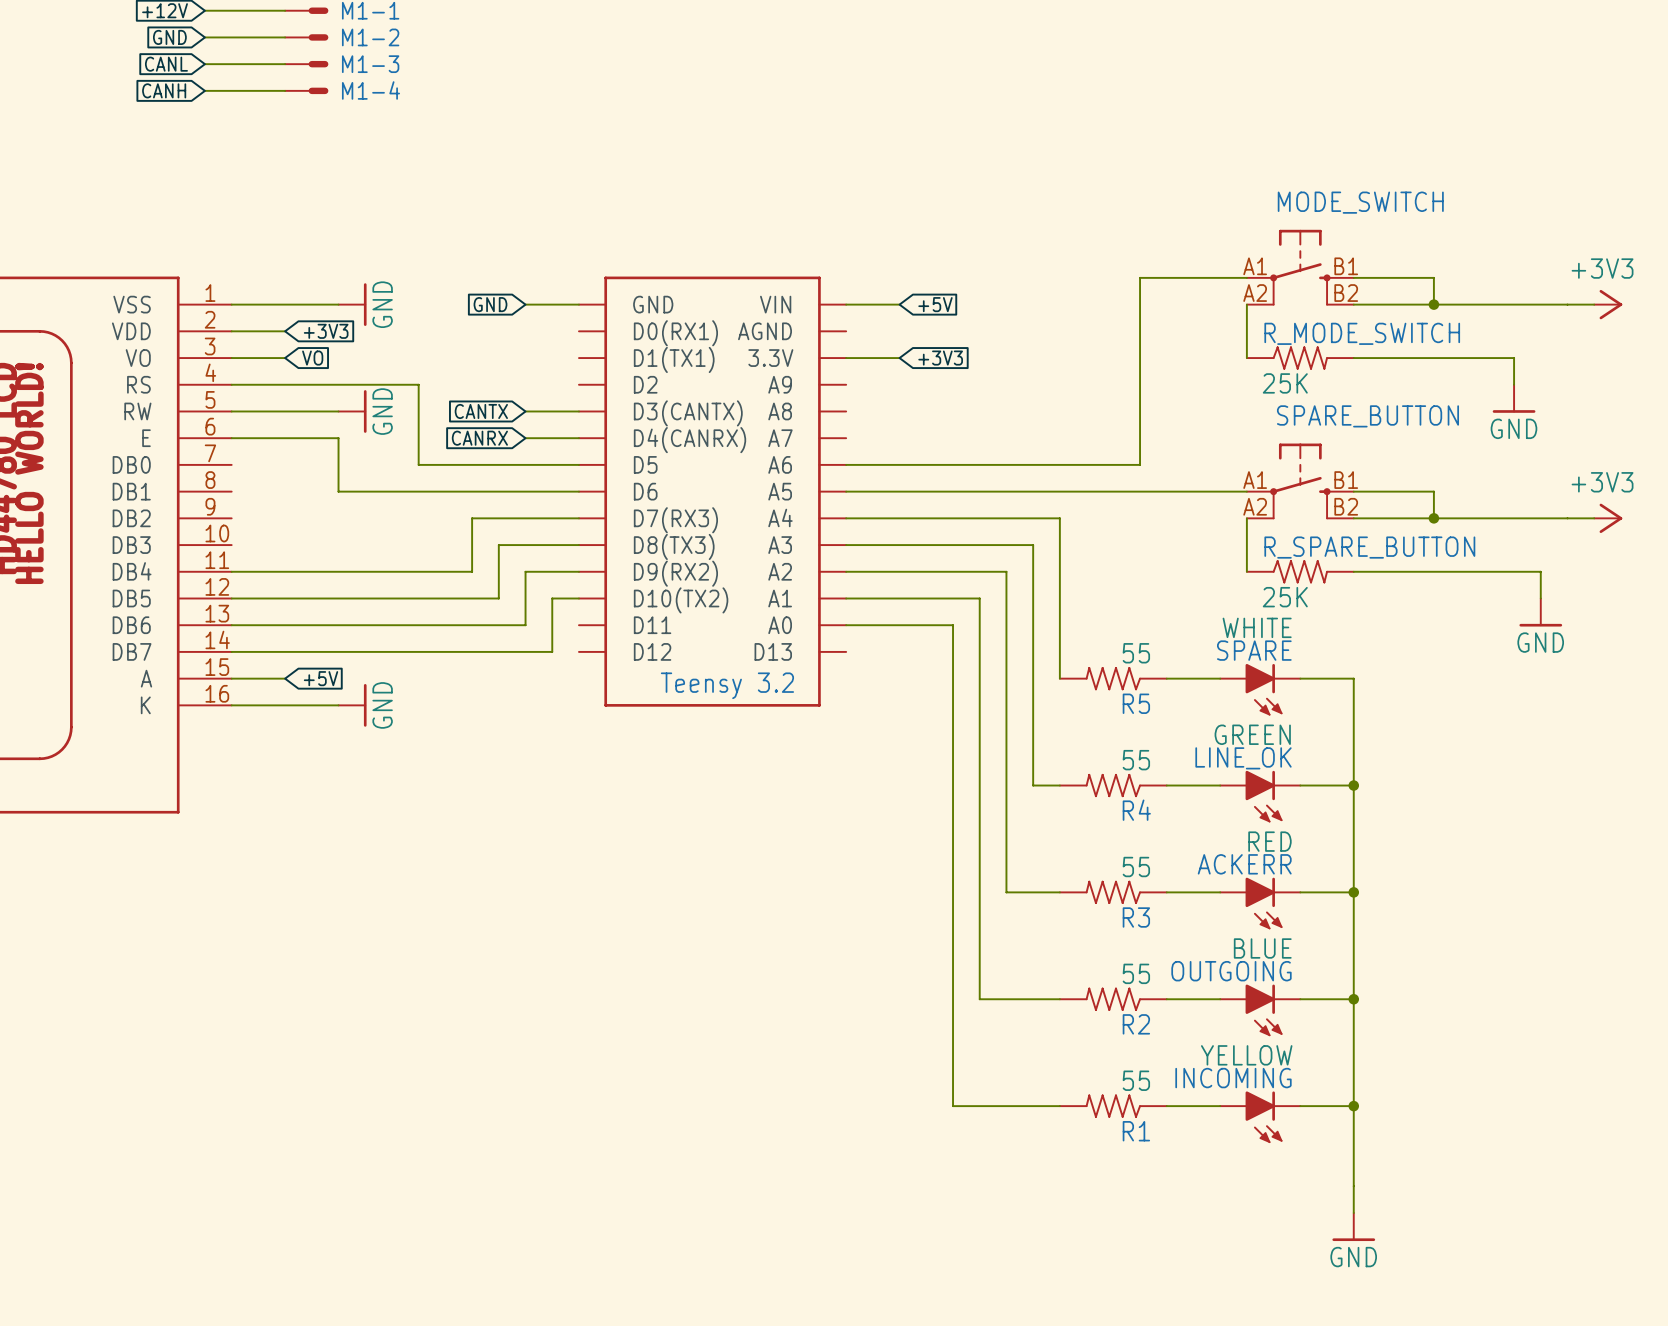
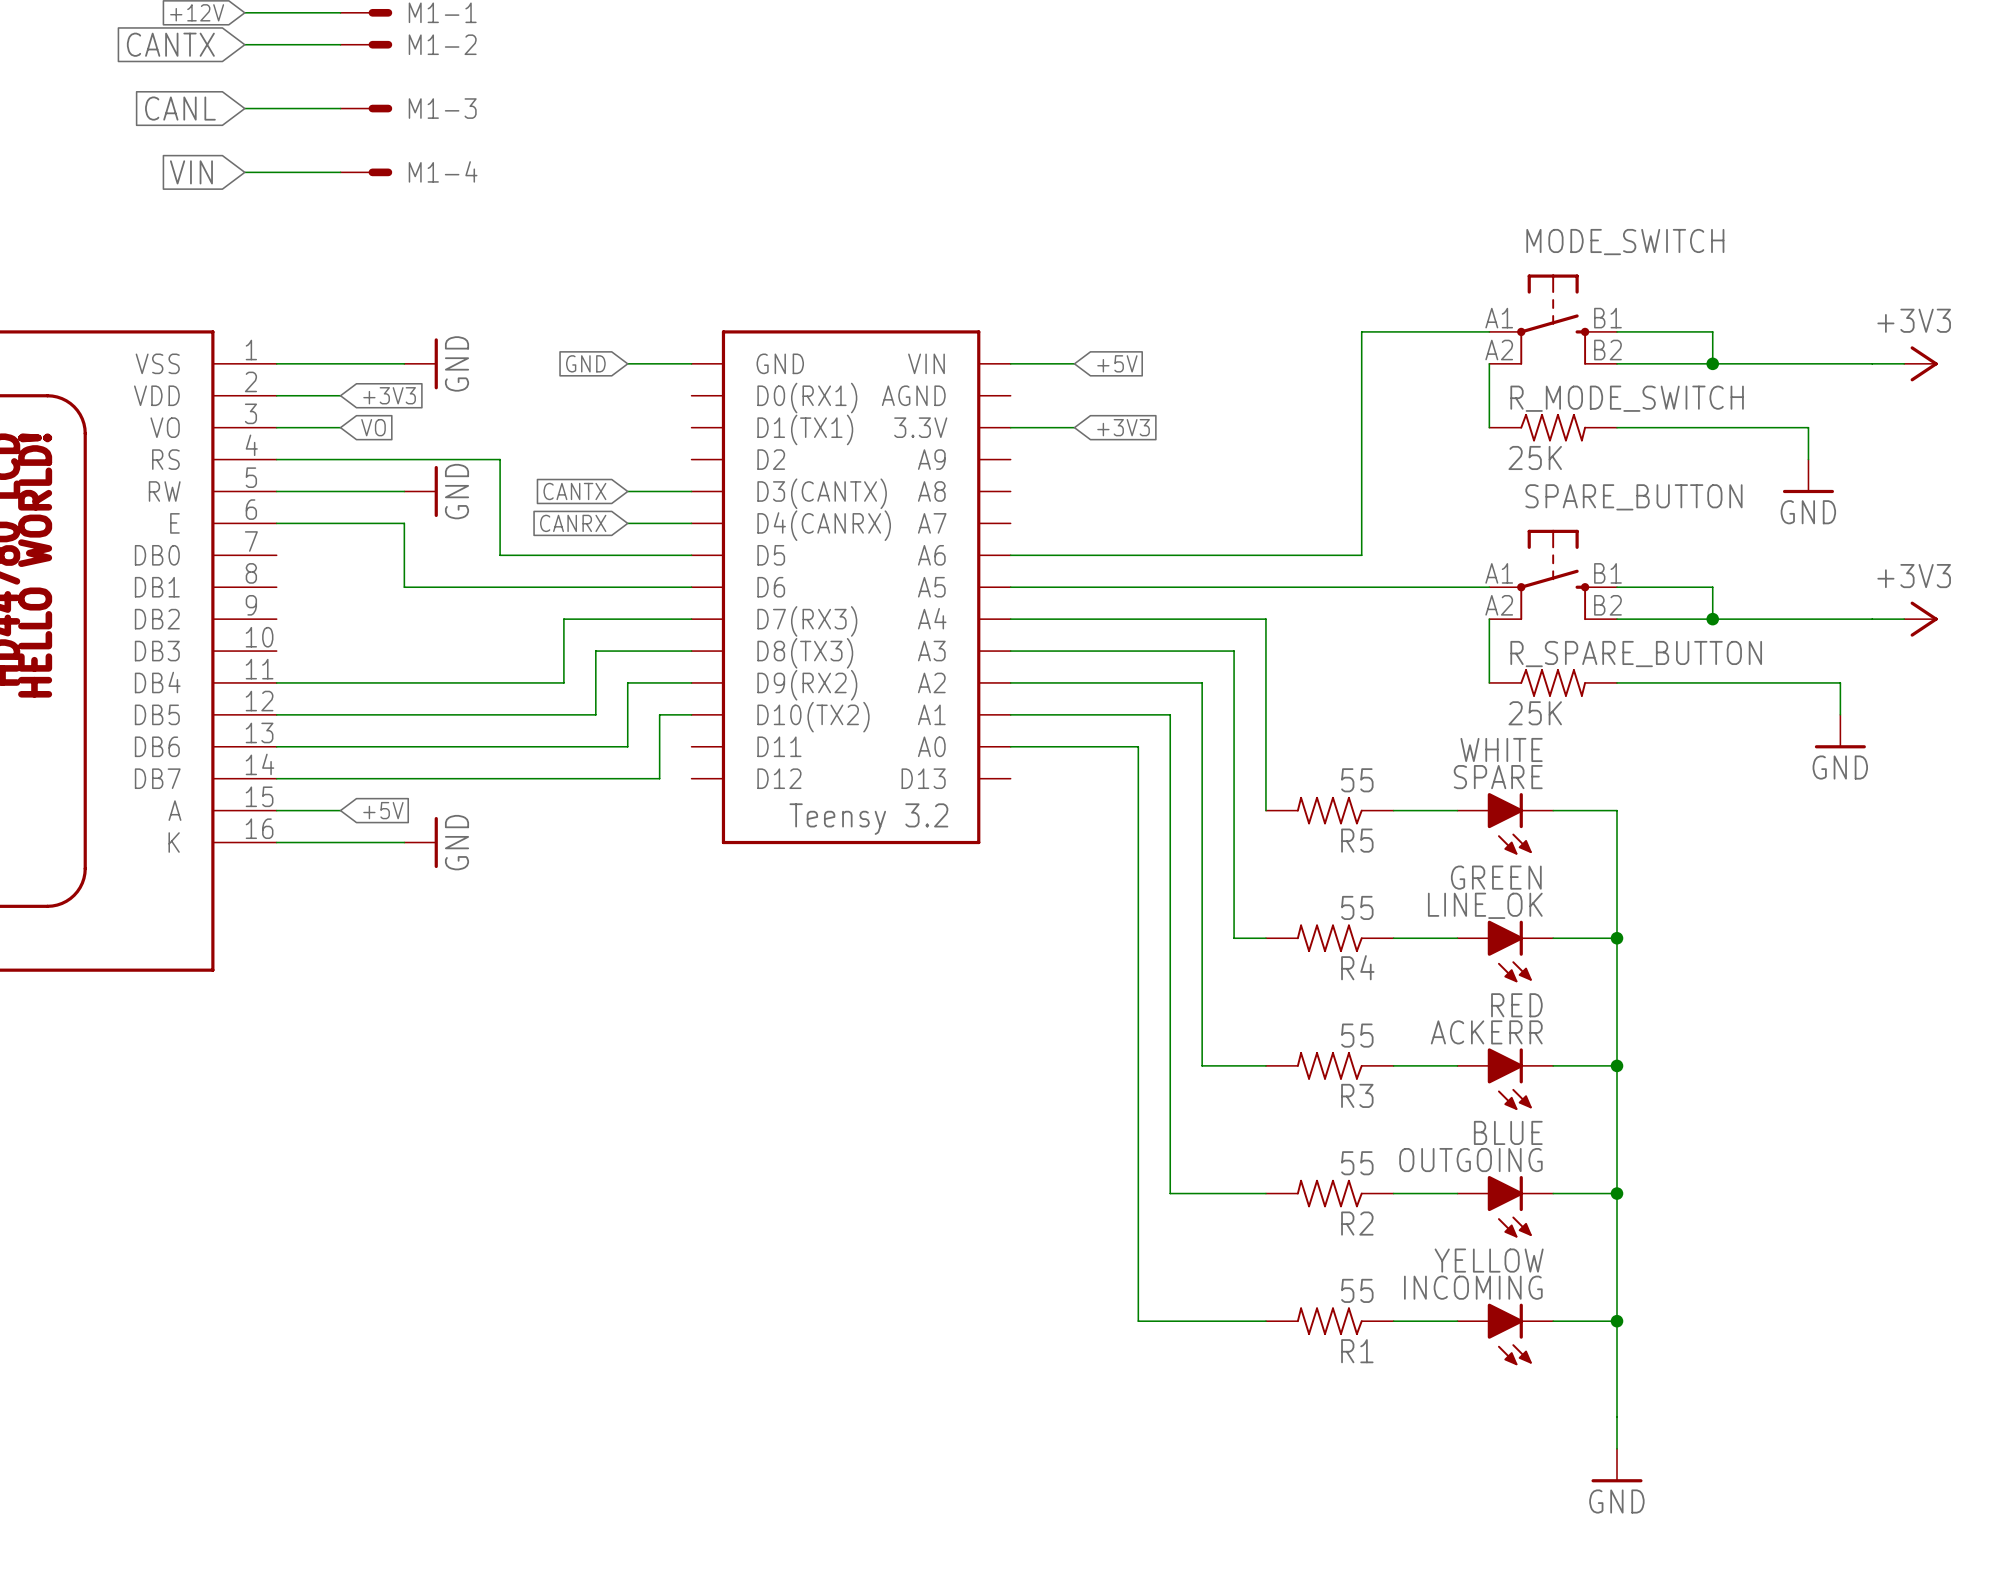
global label: GND (169, 37) -> CANTX (170, 44)
global label: CANL (166, 64) -> none
wire: (204, 64) (285, 64) -> (244, 172) (340, 172)
M1-3: (306, 64) -> none
global label: CANH (164, 90) -> CANL (180, 108)
M1-4 name: M1-4 (370, 90) -> M1-3 (442, 108)
global label: none -> VIN (191, 172)
M1-4: none -> (366, 172)

